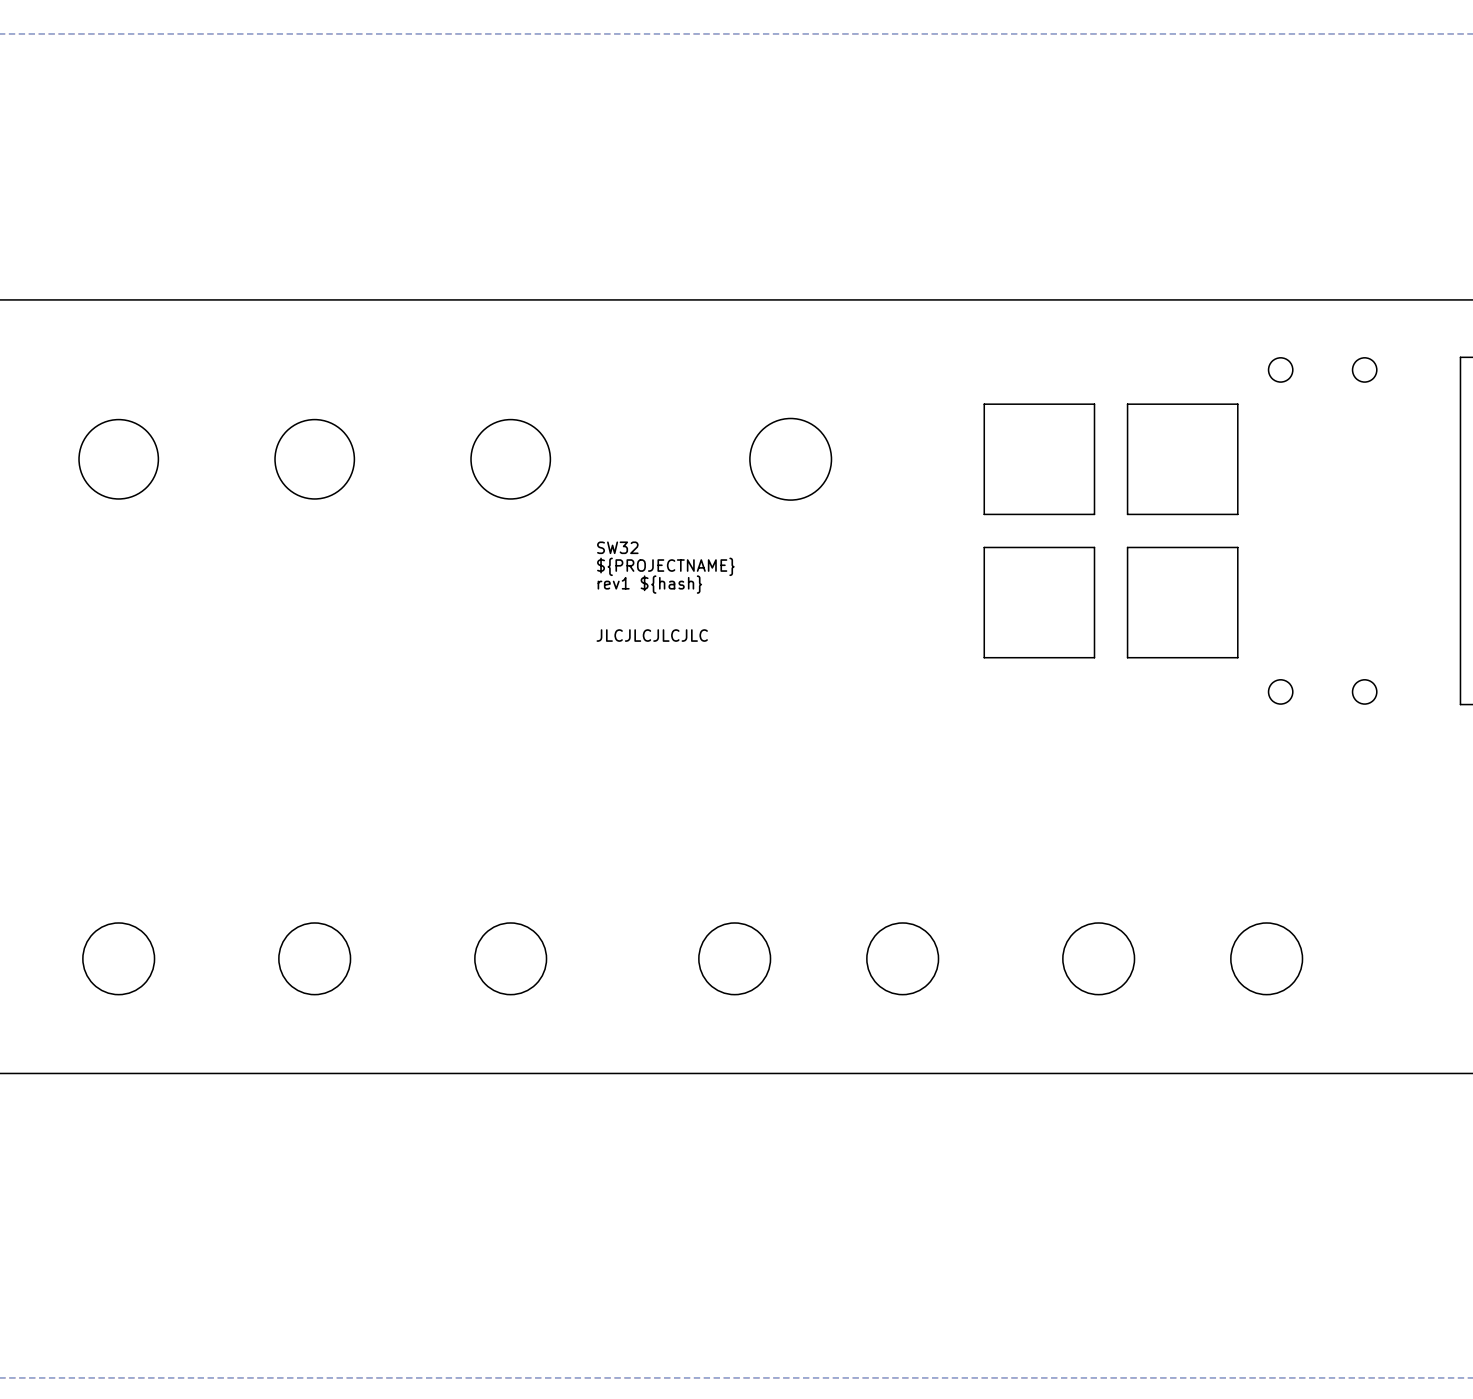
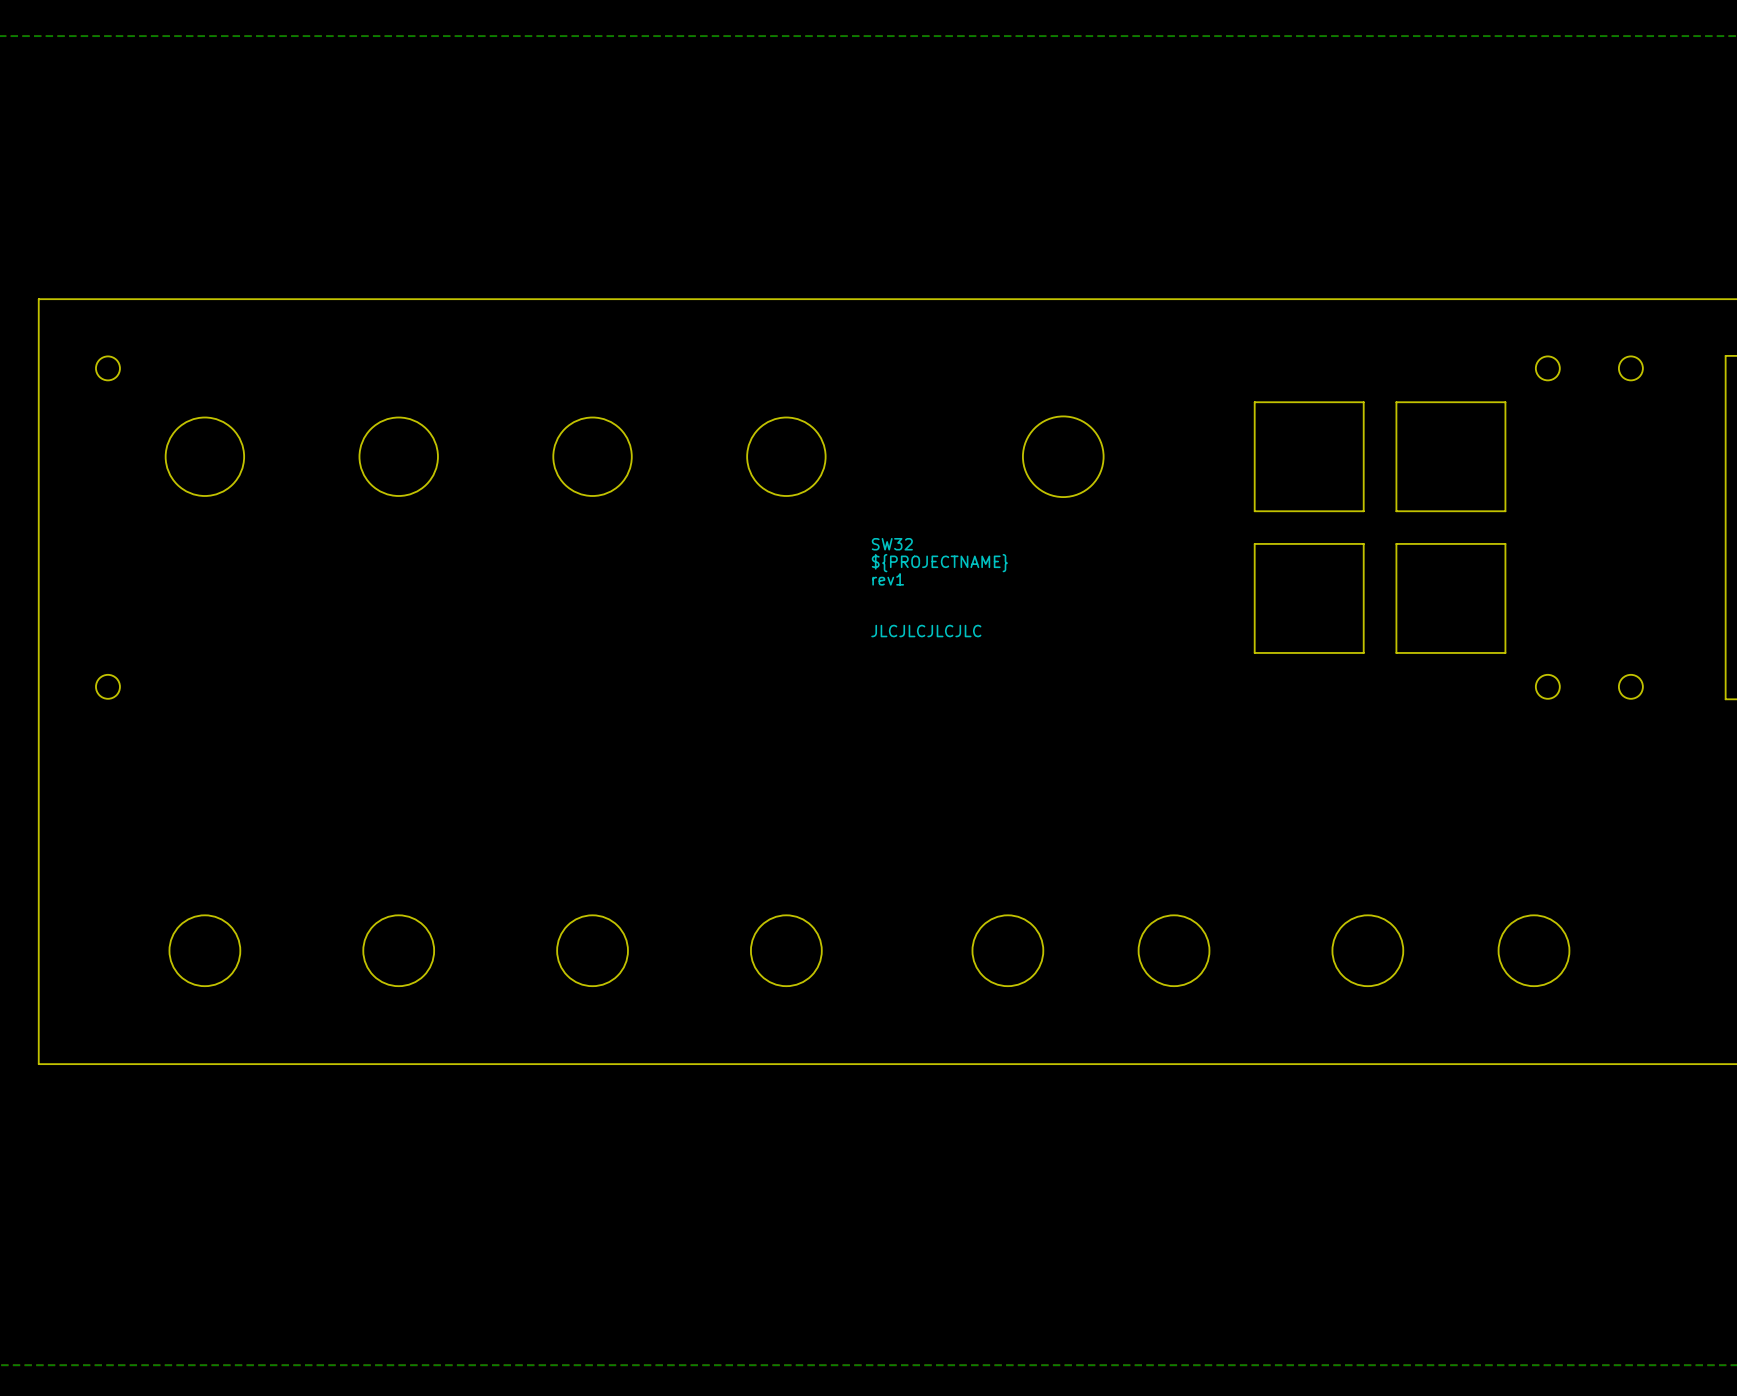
text: rev1 ${hash} (649, 584) -> rev1 (888, 579)

